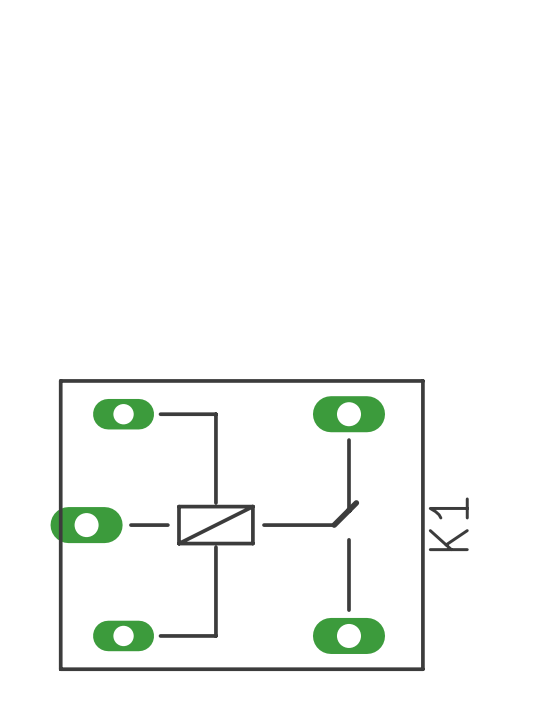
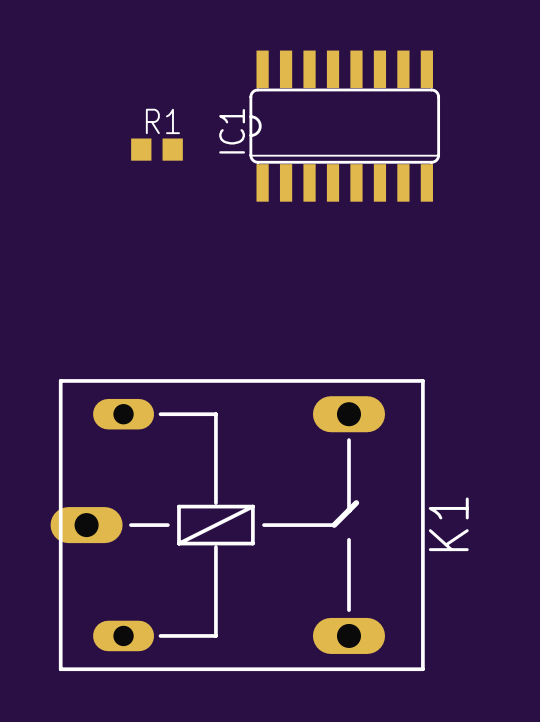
IC1: none -> (344, 126)
R1: none -> (156, 149)

